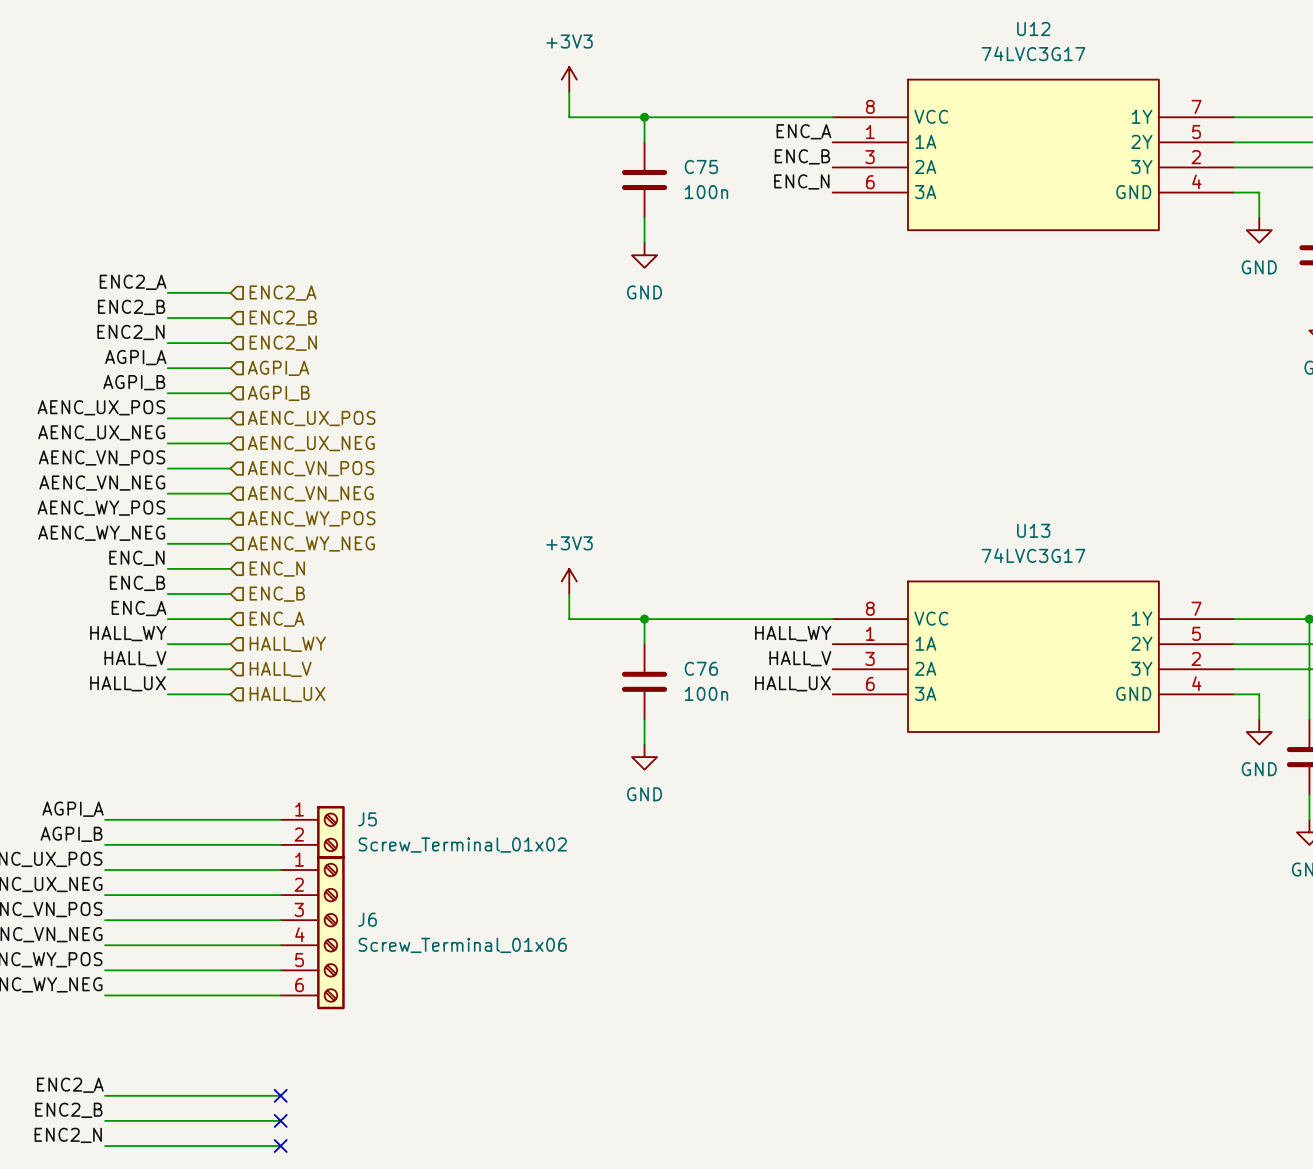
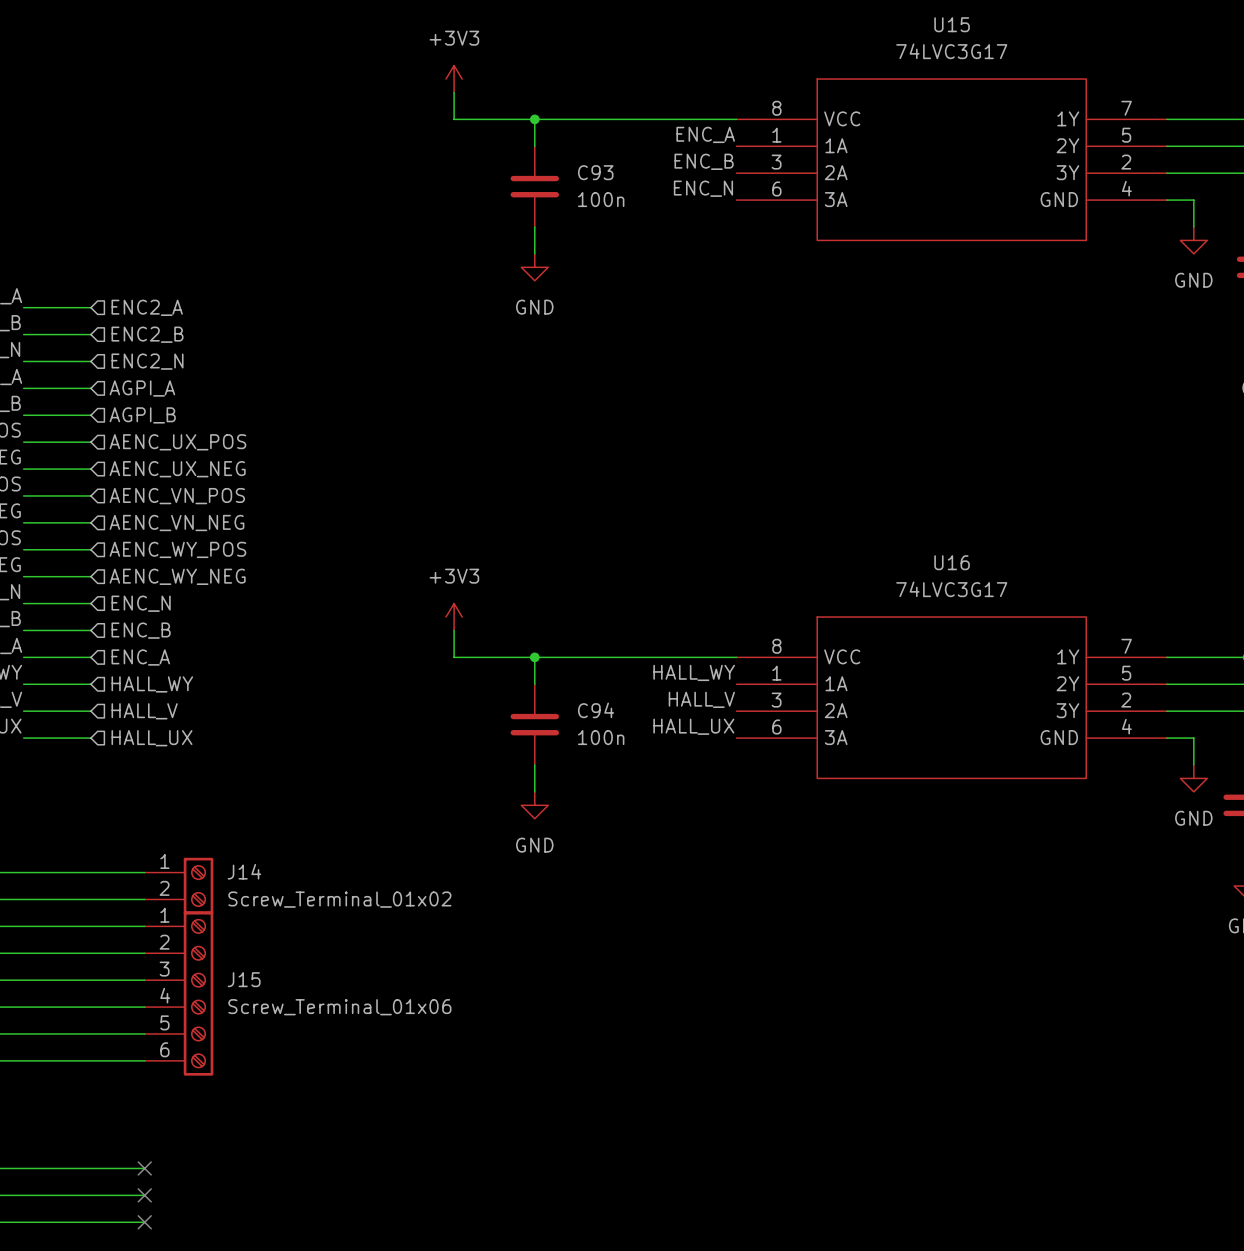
U12 name: U12 (1033, 28) -> U15 (952, 24)
C75 name: C75 (701, 166) -> C93 (595, 172)
U13 name: U13 (1033, 530) -> U16 (952, 562)
C76 name: C76 (701, 668) -> C94 (596, 710)
J5 name: J5 (367, 819) -> J14 (244, 871)
J6 name: J6 (367, 919) -> J15 (244, 979)

